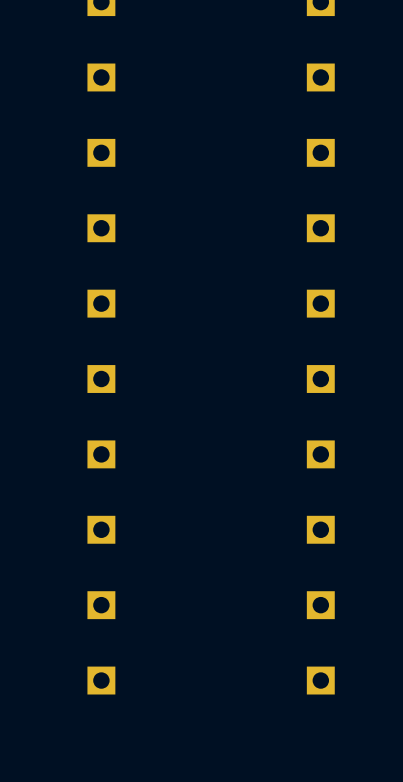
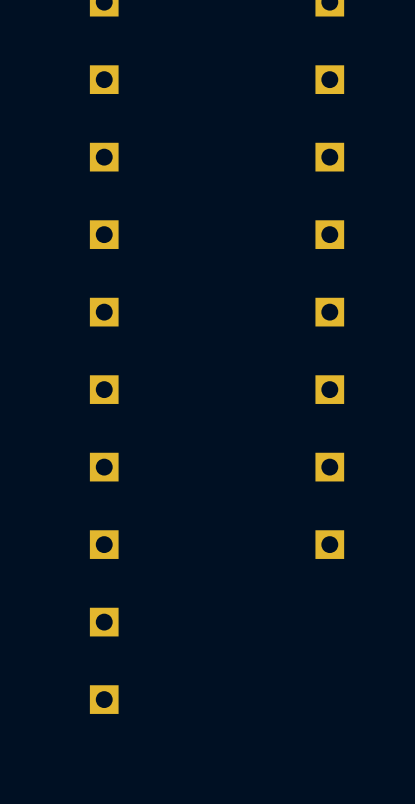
part: (320, 605) -> none
part: (320, 680) -> none

